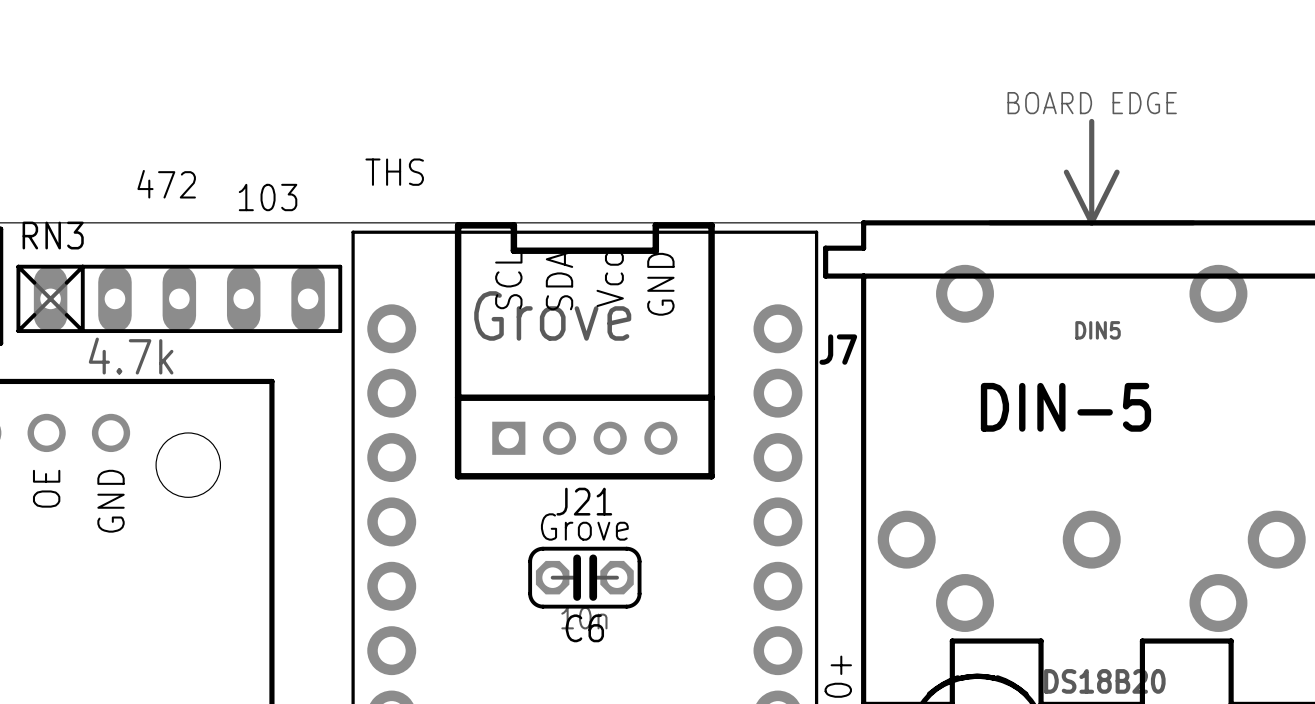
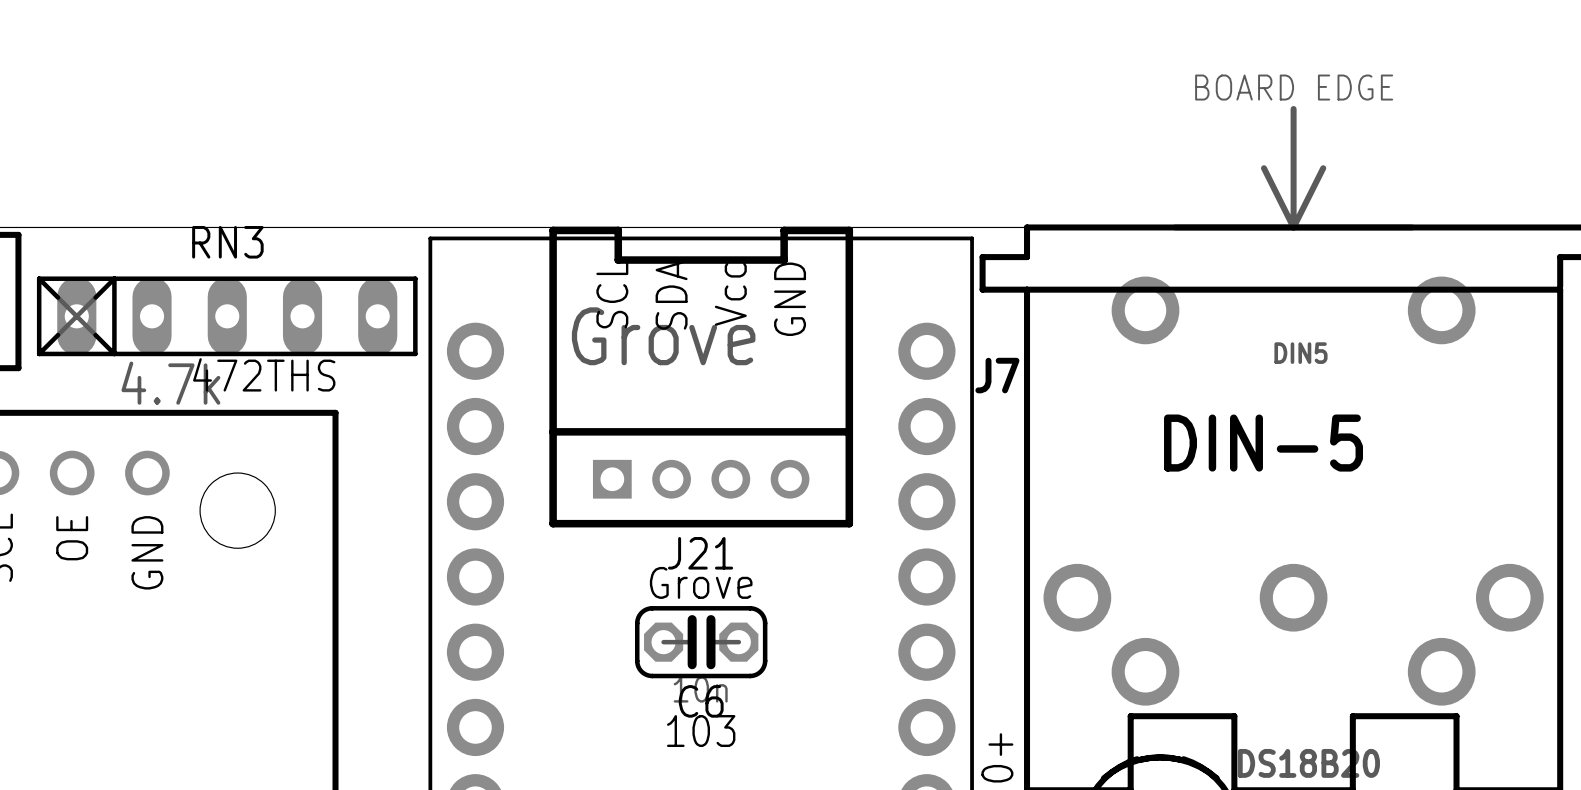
text position: THS (394, 172) -> THS (301, 375)
text position: 472 (166, 184) -> 472 (227, 374)
text position: 103 (268, 197) -> 103 (701, 731)
RN3 name position: RN3 (53, 235) -> RN3 (227, 242)

